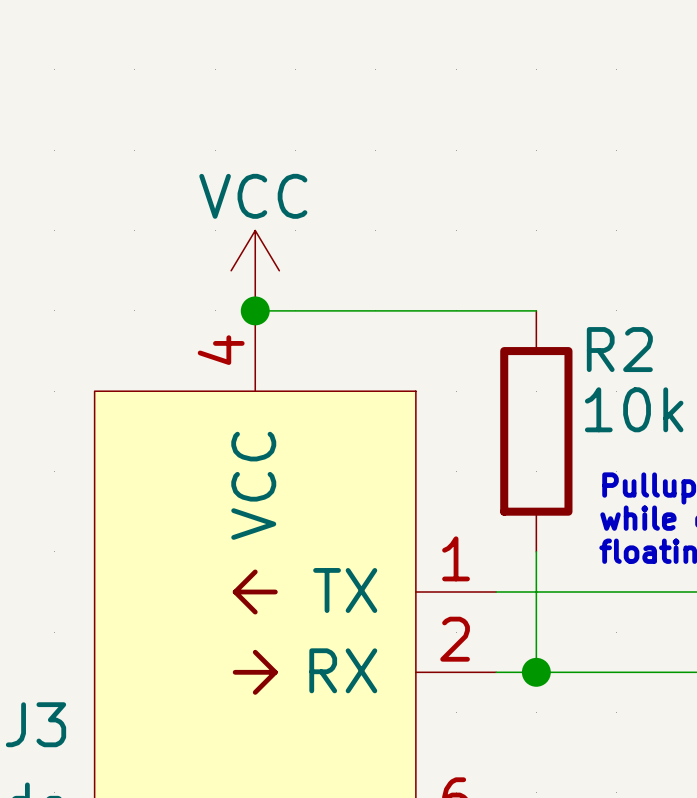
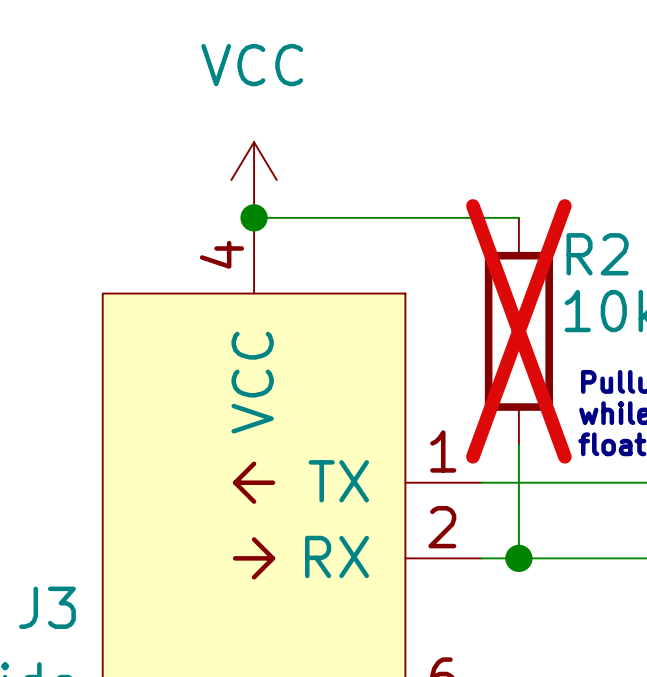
power symbol text position: VCC (253, 196) -> VCC (252, 65)
R2 do-not-place cross: none -> (518, 331)

